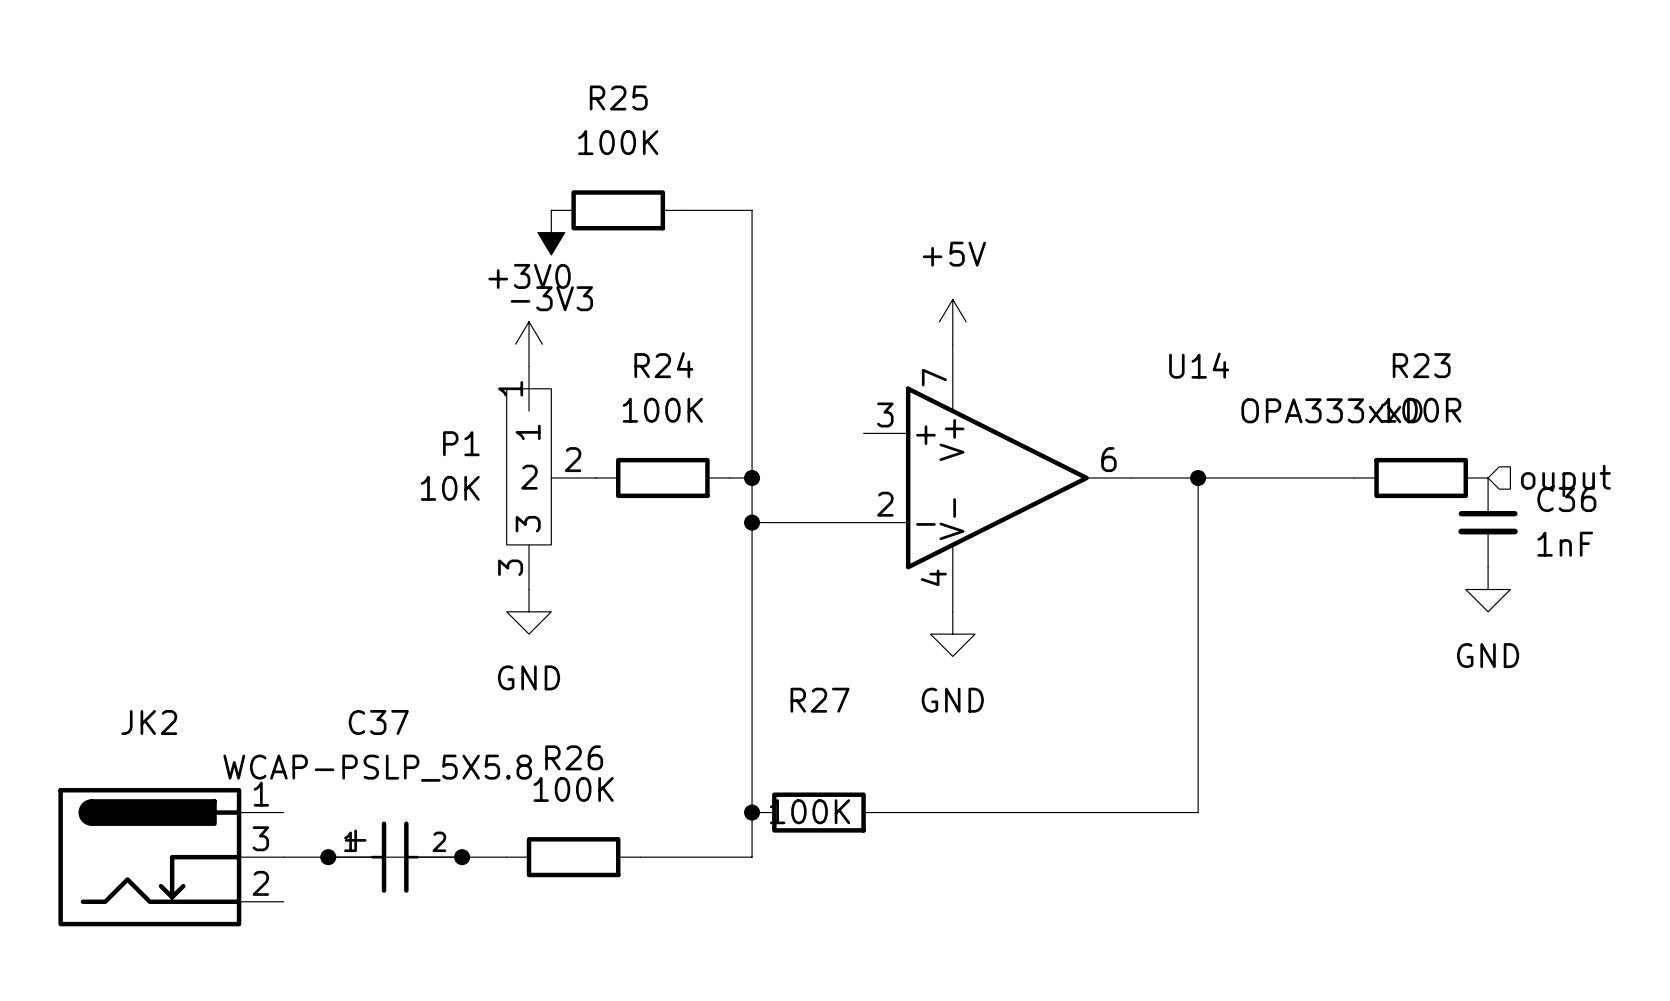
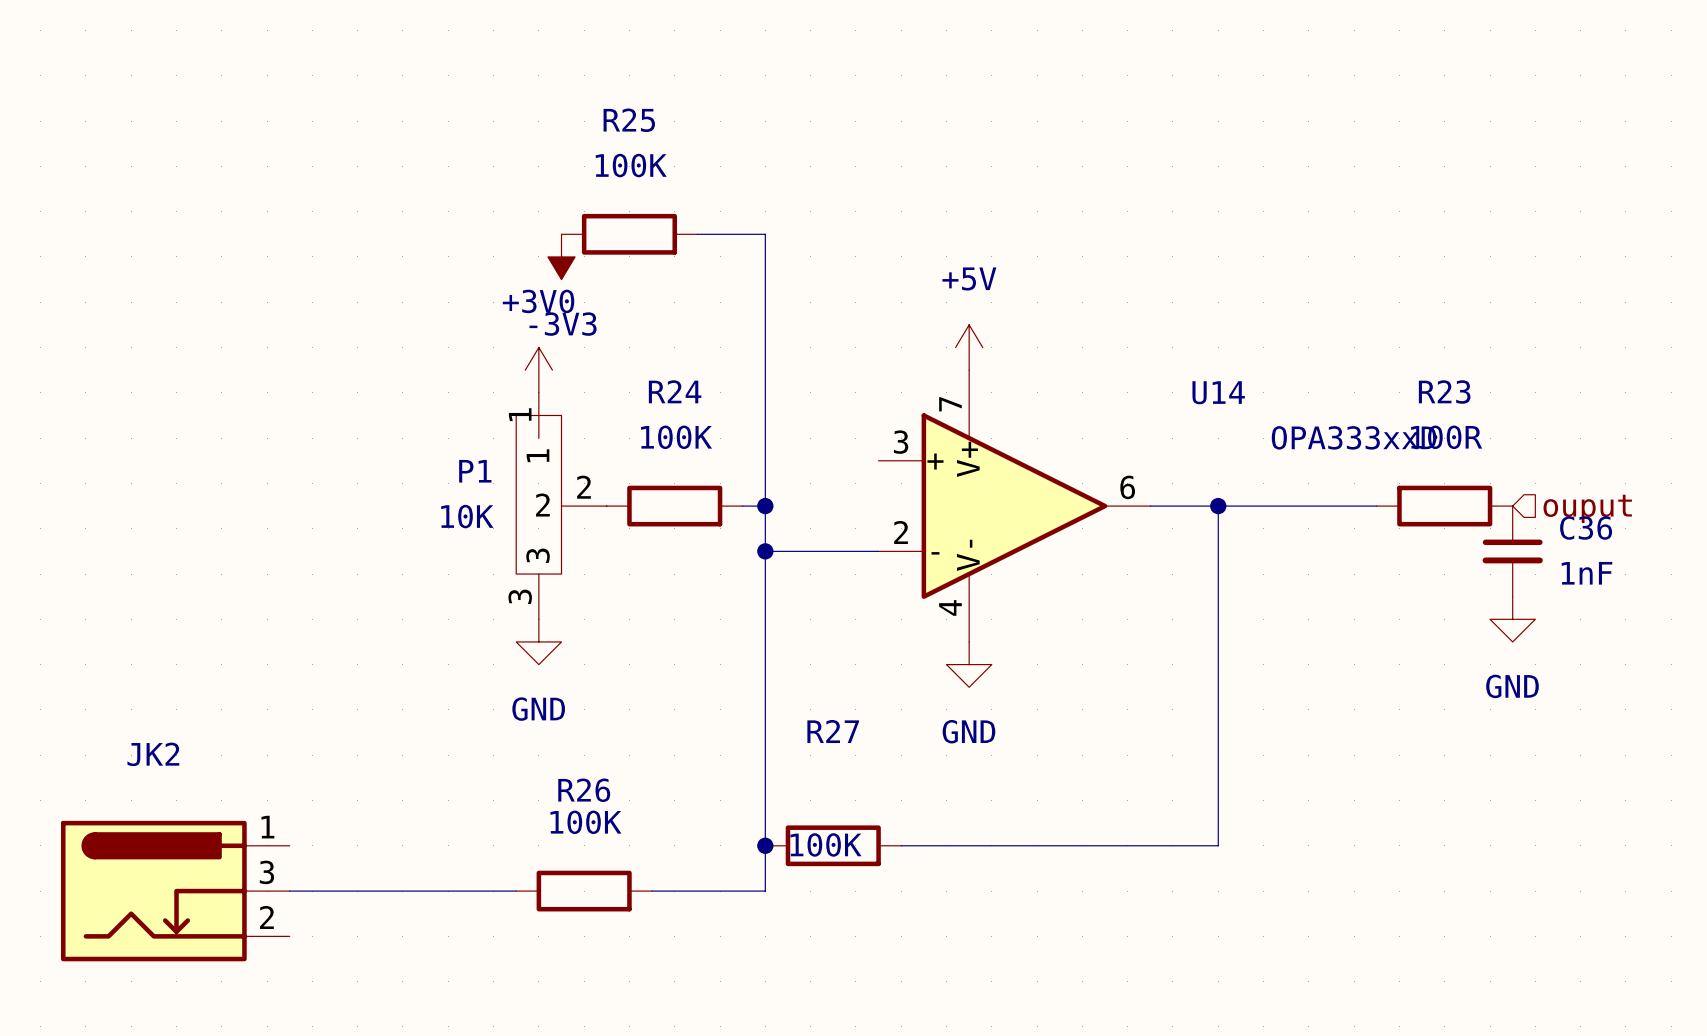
junction: (328, 857) -> none
C37: WCAP-PSLP_5X5.8 (395, 857) -> none
junction: (462, 857) -> none

